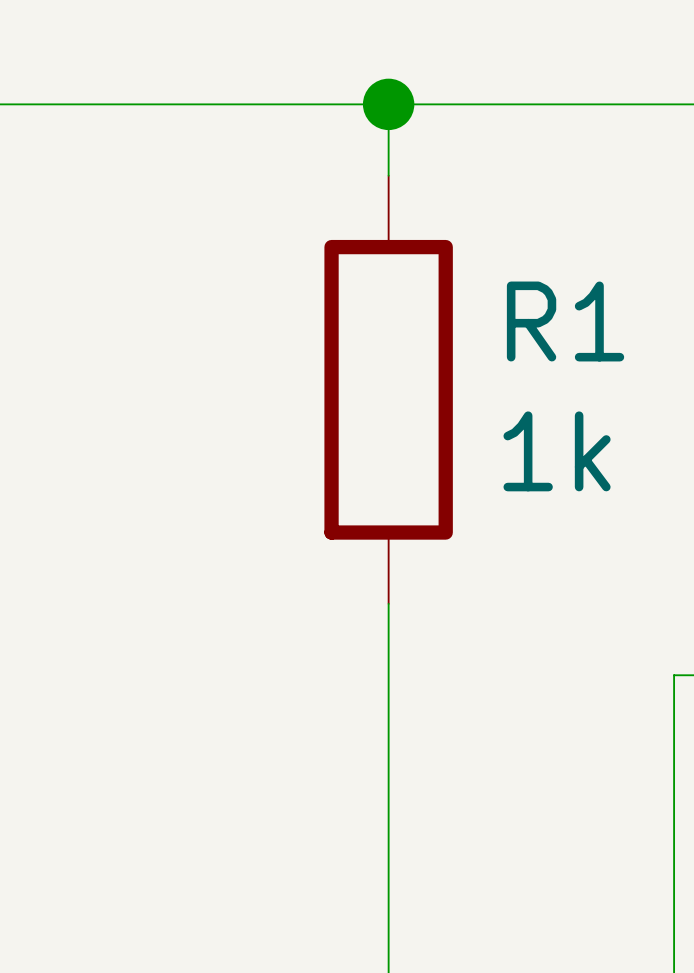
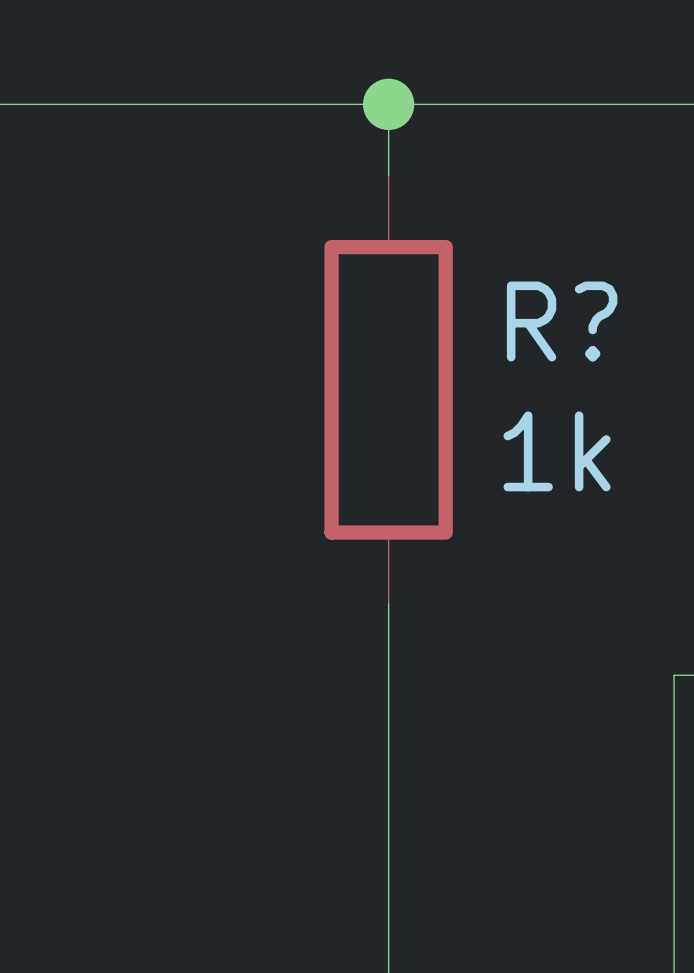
R1 name: R1 (565, 321) -> R? (562, 321)

